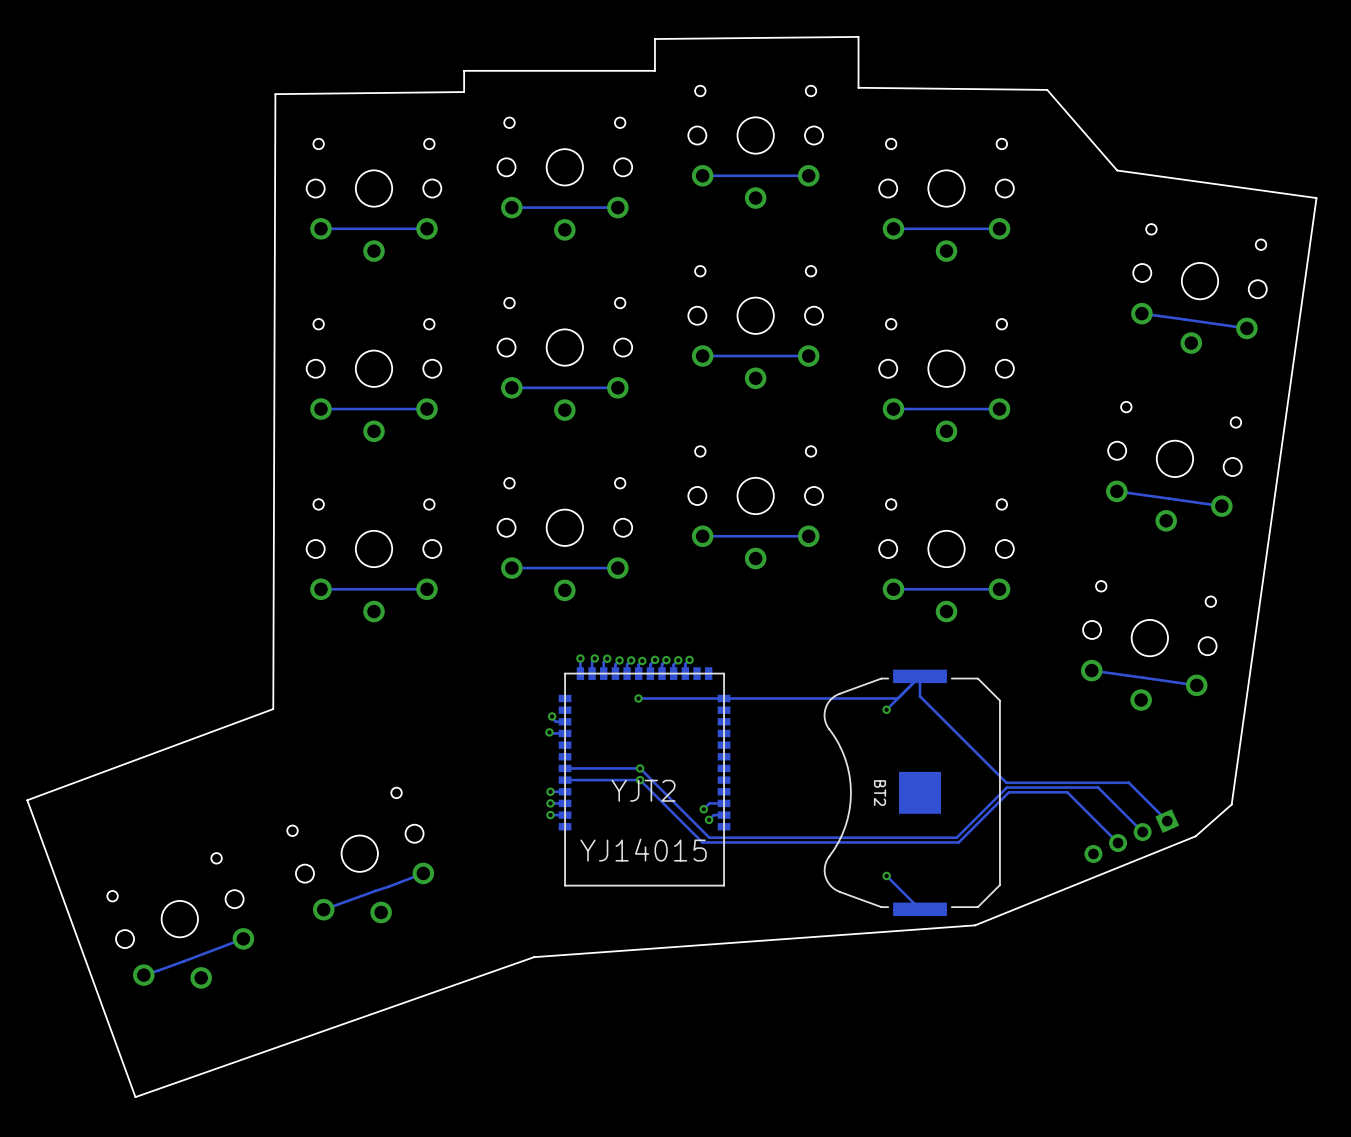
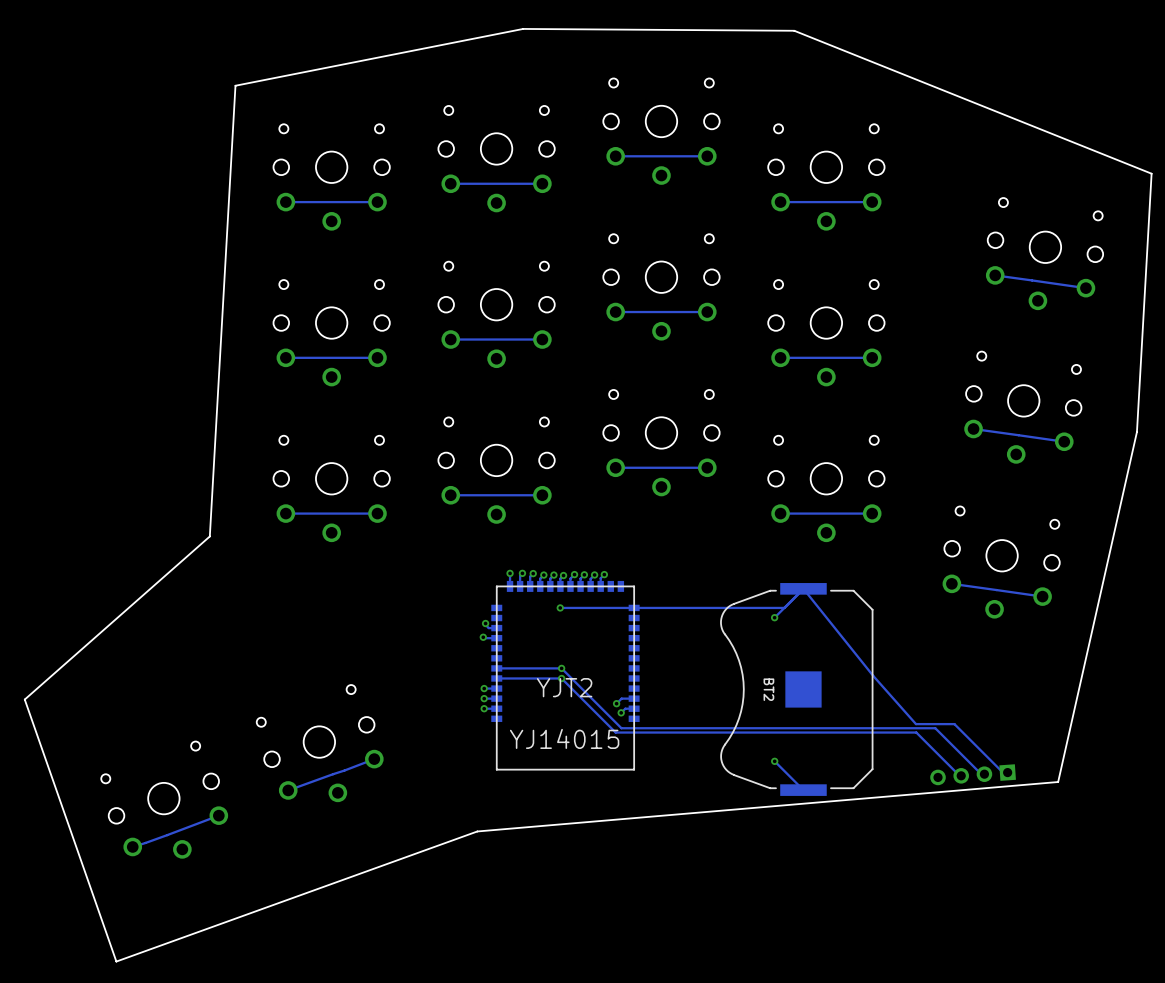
board edge: (858, 36) (654, 39) (654, 70) (464, 70) (464, 92) (275, 94) (273, 709) (27, 800) (135, 1097) (534, 957) (975, 925) (1195, 836) (1231, 804) (1316, 198) (1117, 170) (1047, 89) (858, 87) (858, 36) -> (523, 28) (794, 30) (1151, 173) (1136, 432) (1058, 782) (477, 831) (116, 961) (24, 699) (209, 536) (235, 85) (523, 28)
track: (920, 676) (920, 696) (1006, 782) (1128, 782) (1167, 821) -> (803, 588) (873, 675) (915, 724) (954, 724) (1007, 777)
track: (1142, 832) (1098, 787) (1006, 787) (956, 837) -> (984, 777) (935, 728) (835, 728)
part: (1131, 836) -> none
track: (702, 842) (958, 842) (1008, 792) (1067, 792) (1118, 843) -> (615, 732) (916, 732) (961, 777)
part: none -> (973, 774)

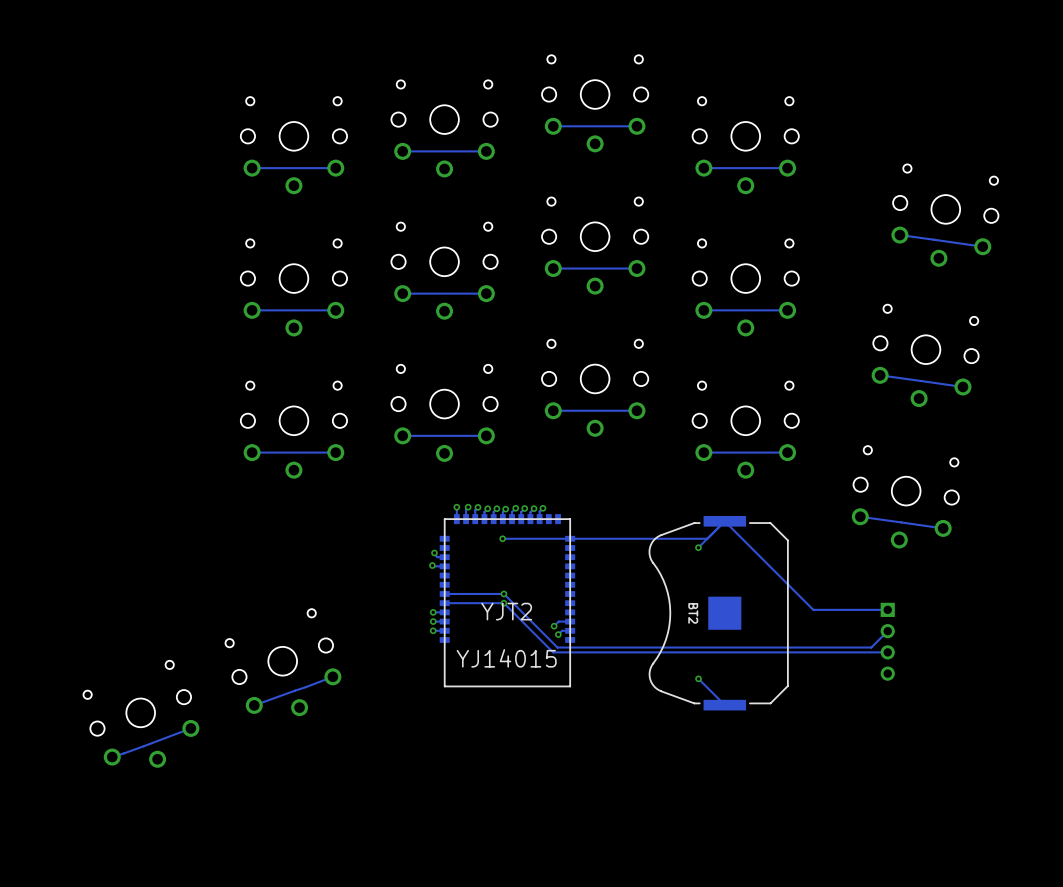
board edge: (523, 28) (794, 30) (1151, 173) (1136, 432) (1058, 782) (477, 831) (116, 961) (24, 699) (209, 536) (235, 85) (523, 28) -> none
track: (803, 588) (873, 675) (915, 724) (954, 724) (1007, 777) -> (724, 521) (813, 609) (887, 609)
part: none -> (887, 641)
track: (620, 727) (935, 728) (984, 777) -> (557, 647) (871, 647) (887, 631)
track: (615, 732) (916, 732) (961, 777) -> (553, 652) (887, 652)
part: (973, 774) -> none

